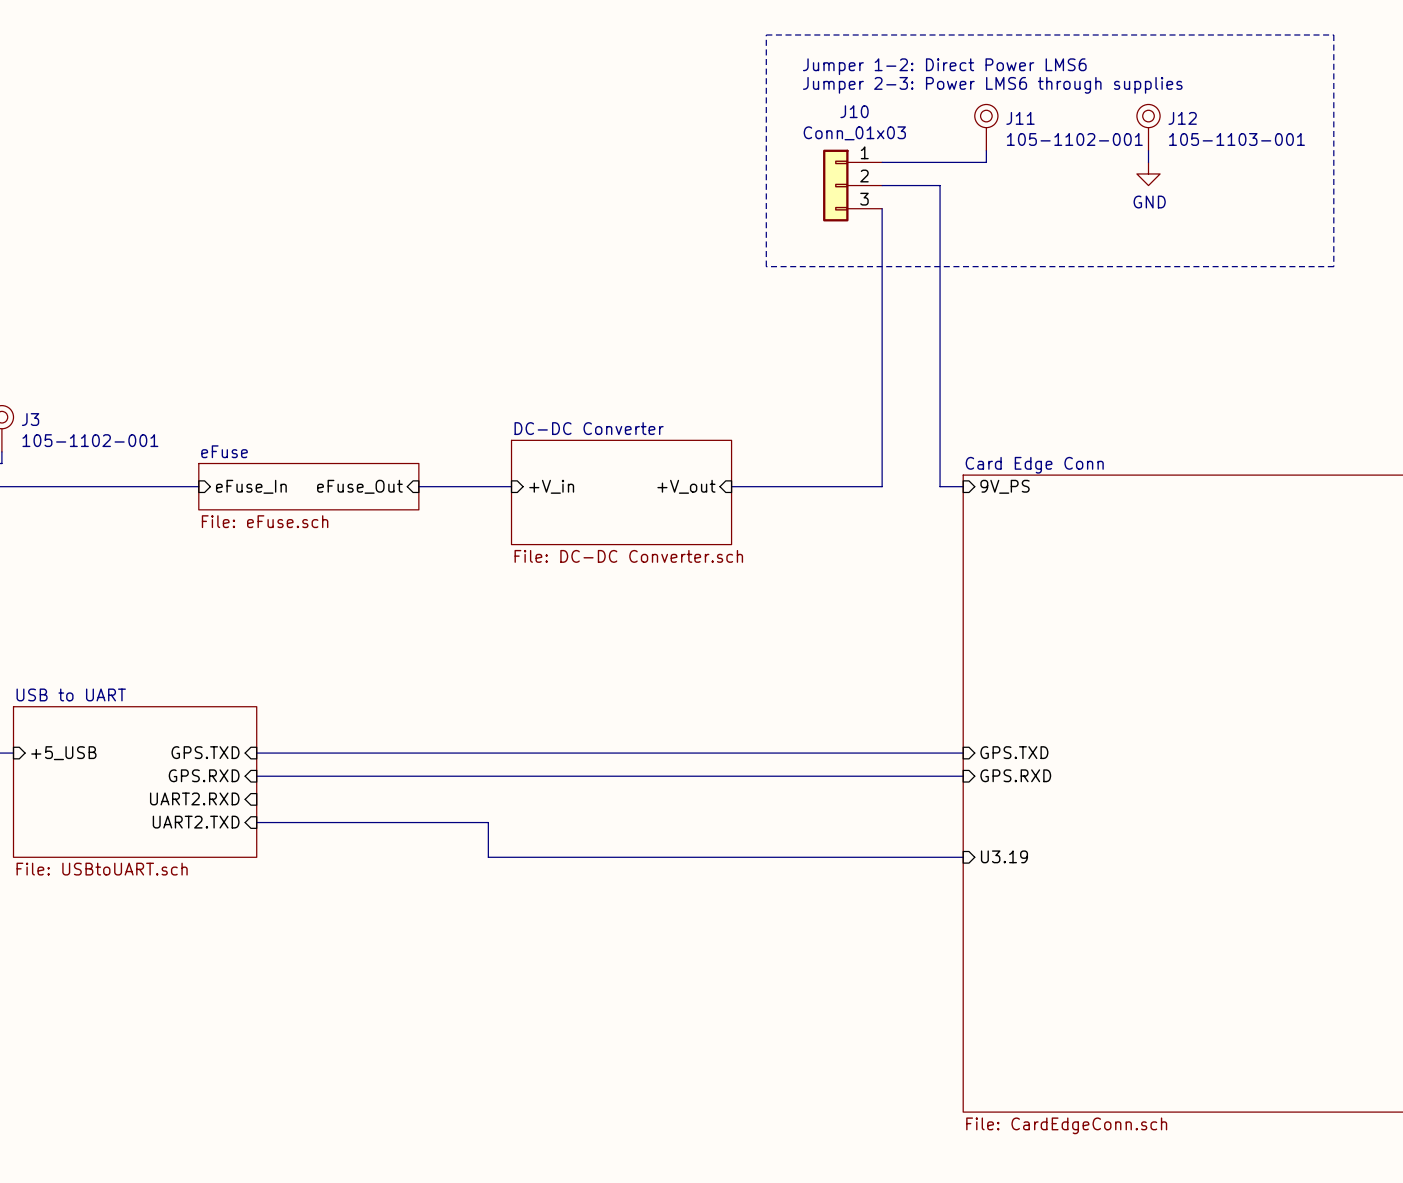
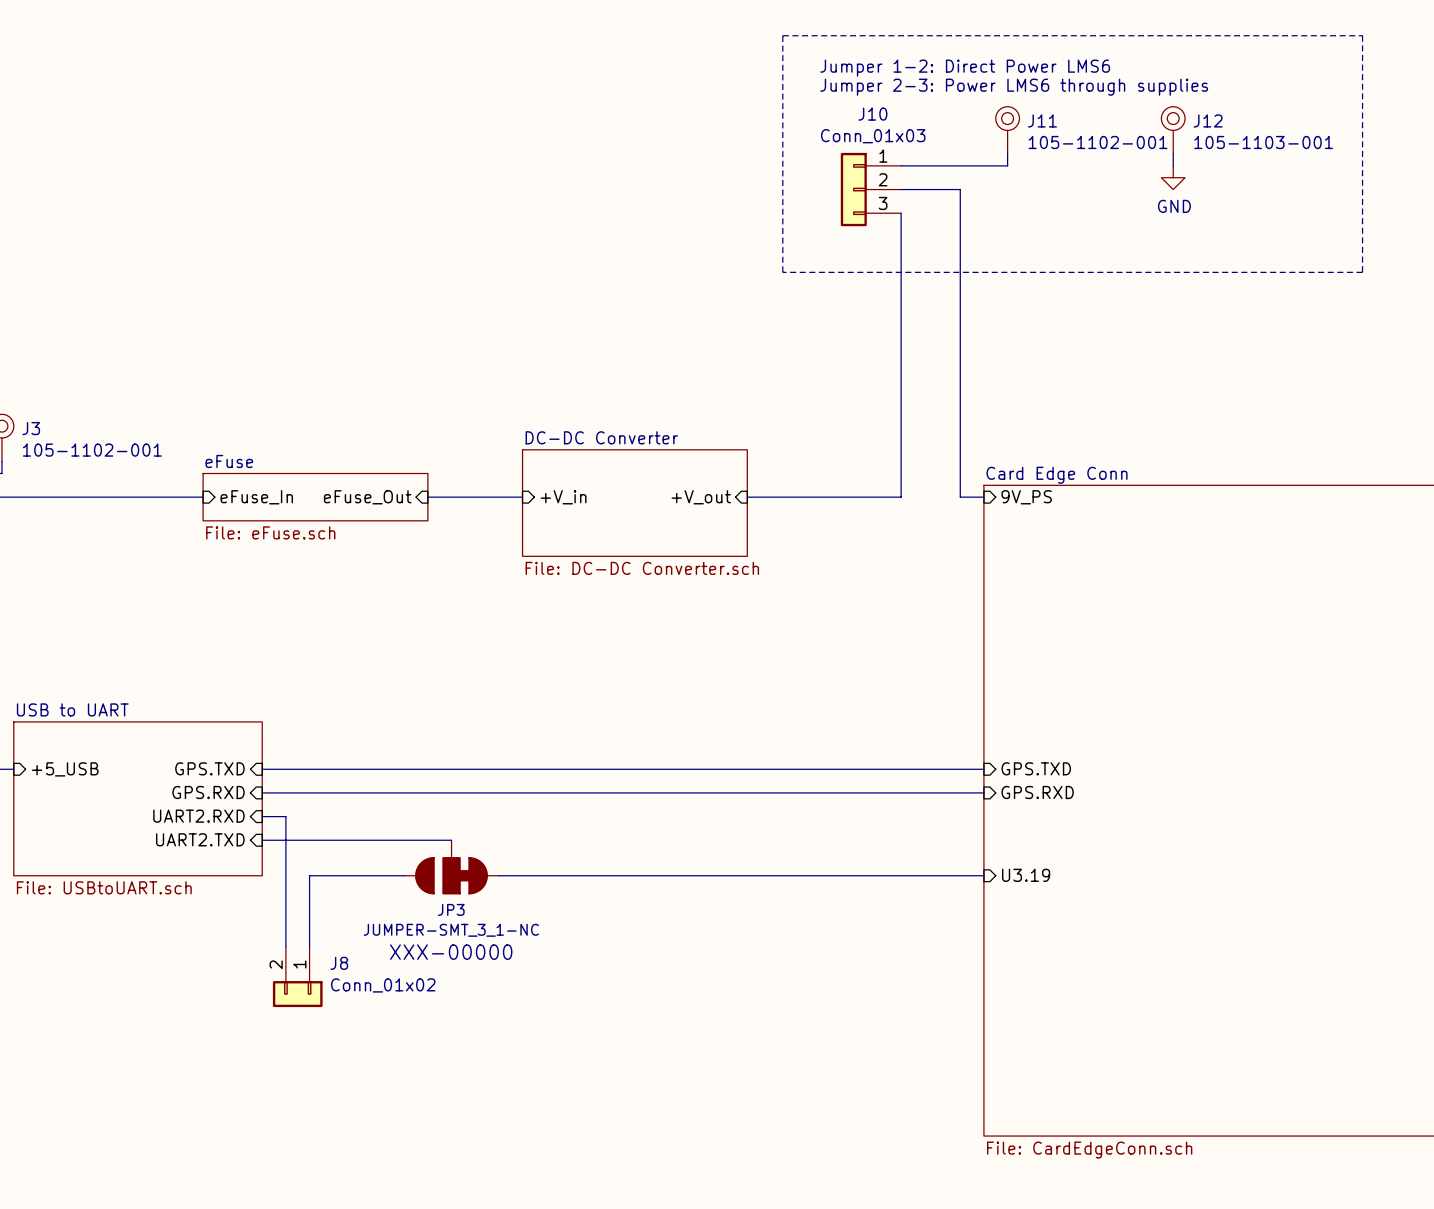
wire: none -> (262, 816) (285, 816) (285, 946)
wire: (442, 822) (488, 822) (488, 857) -> none
JP3: none -> JUMPER-SMT_3_1-NC (451, 867)
wire: none -> (404, 875) (309, 875) (309, 946)
J8: none -> Conn_01x02 (297, 976)

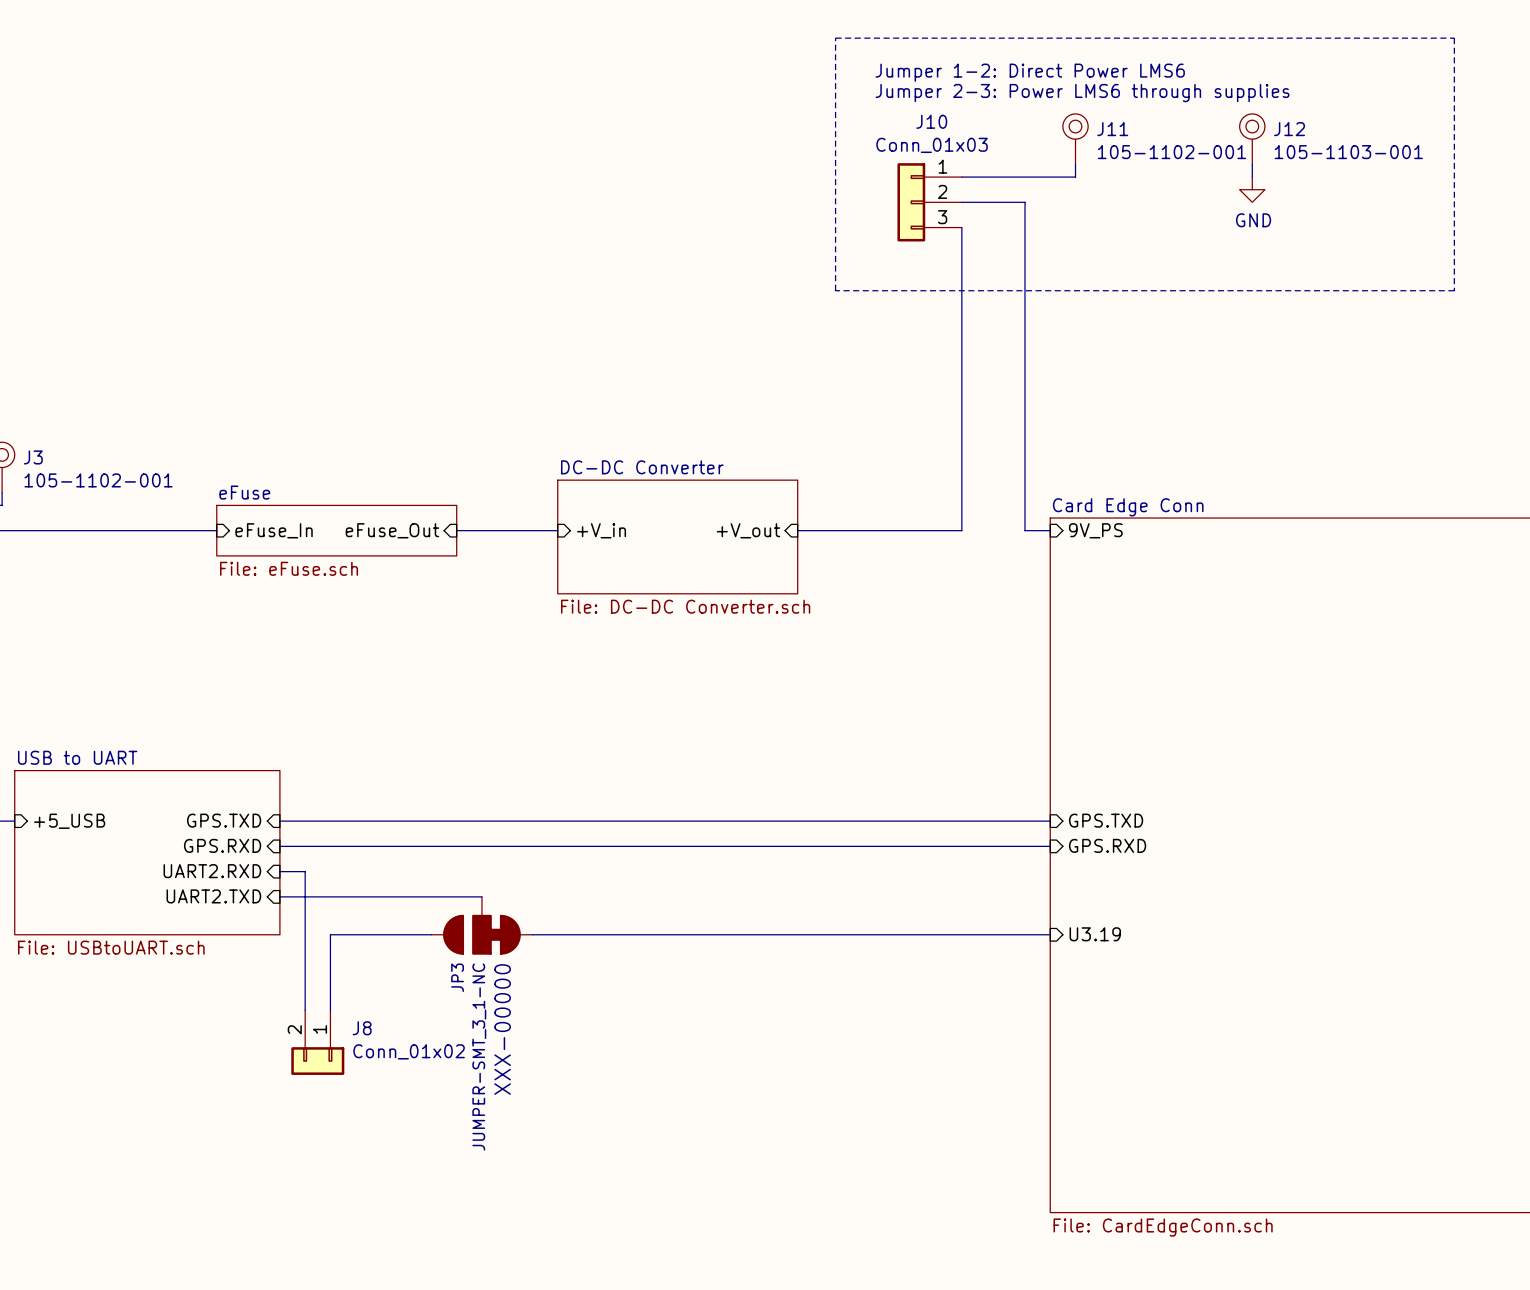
JP3 name rotation: 0° (451, 909) -> 90° counterclockwise (457, 977)
JP3 value rotation: 0° (451, 930) -> 90° counterclockwise (479, 1057)
JP3 text rotation: 0° (451, 952) -> 90° counterclockwise (502, 1029)

